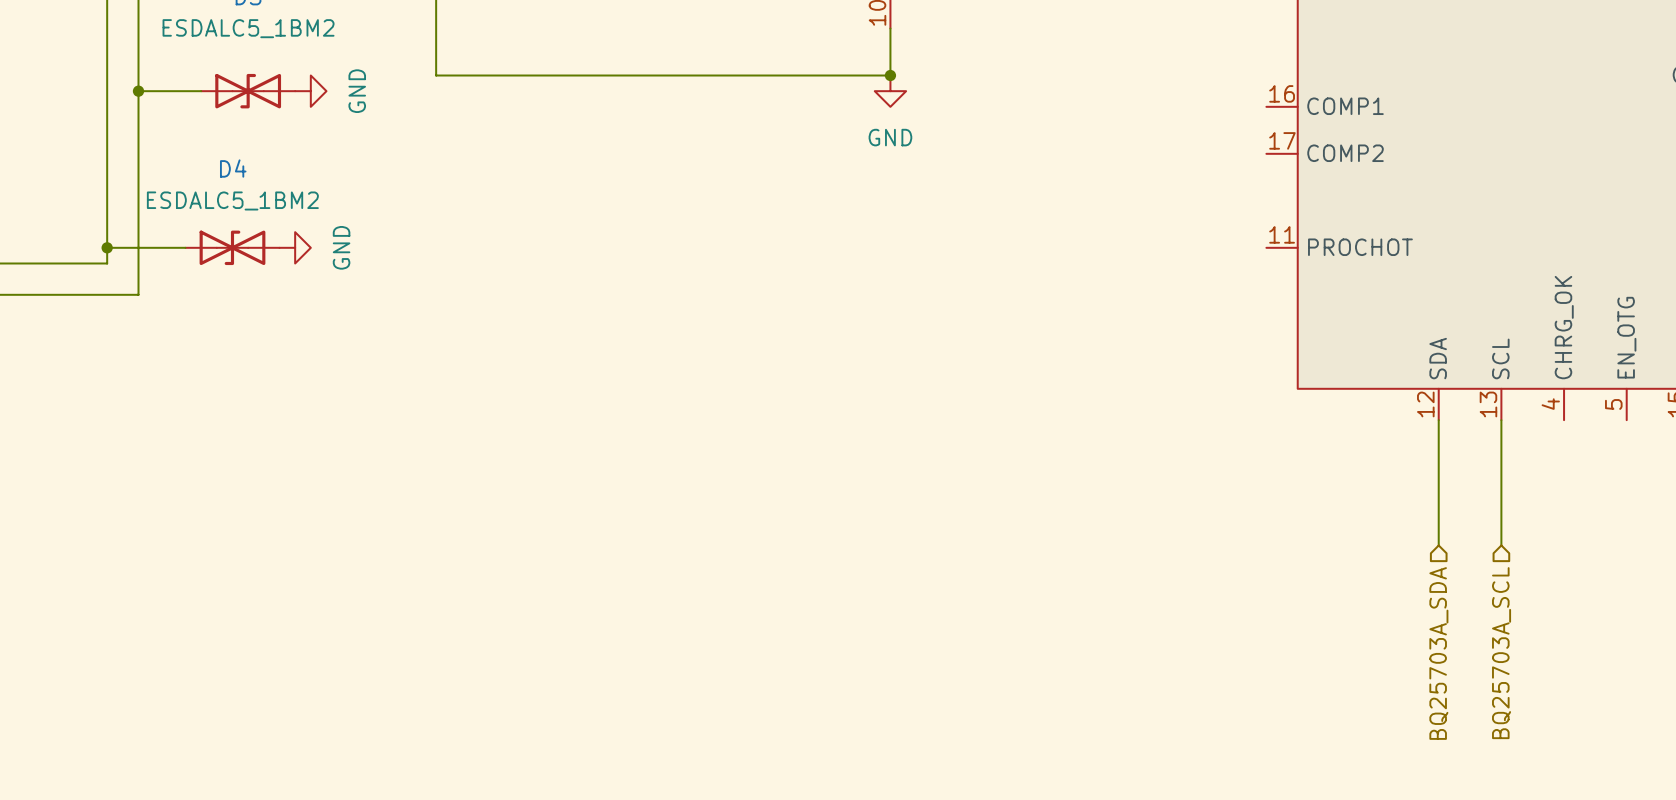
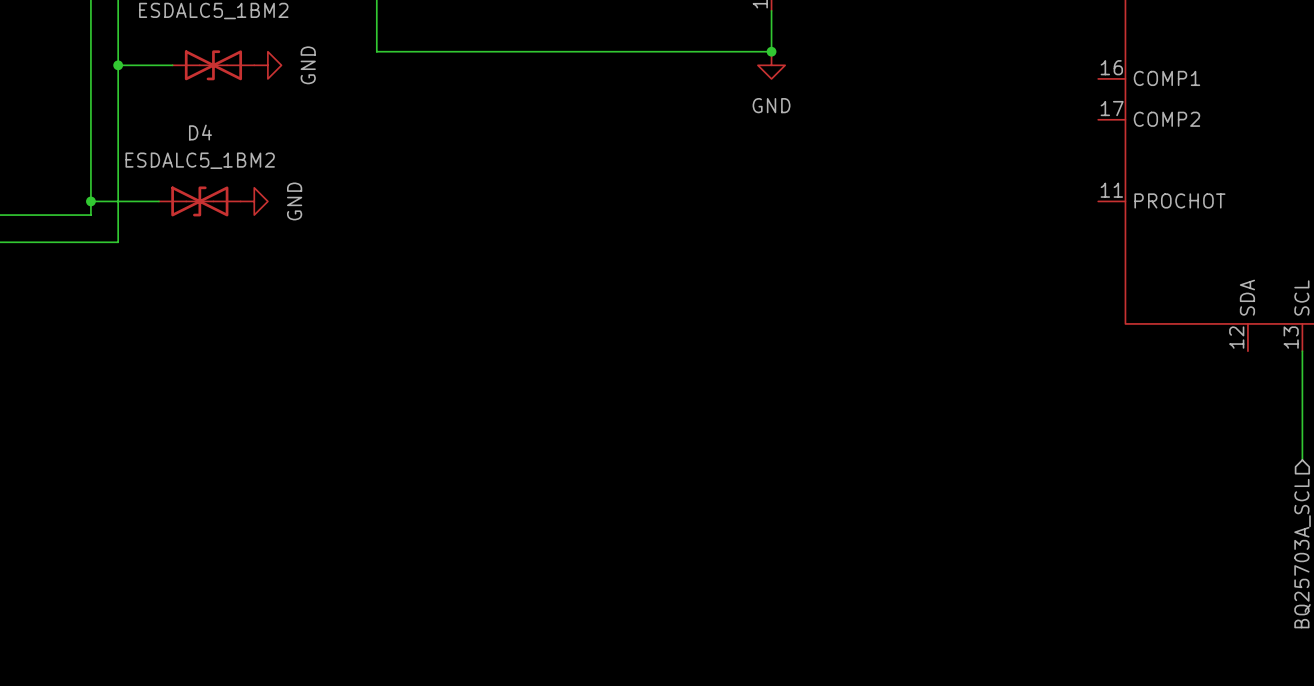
wire: (1438, 420) (1438, 545) -> none
hierarchical label: BQ25703A_SDA (1438, 653) -> none

